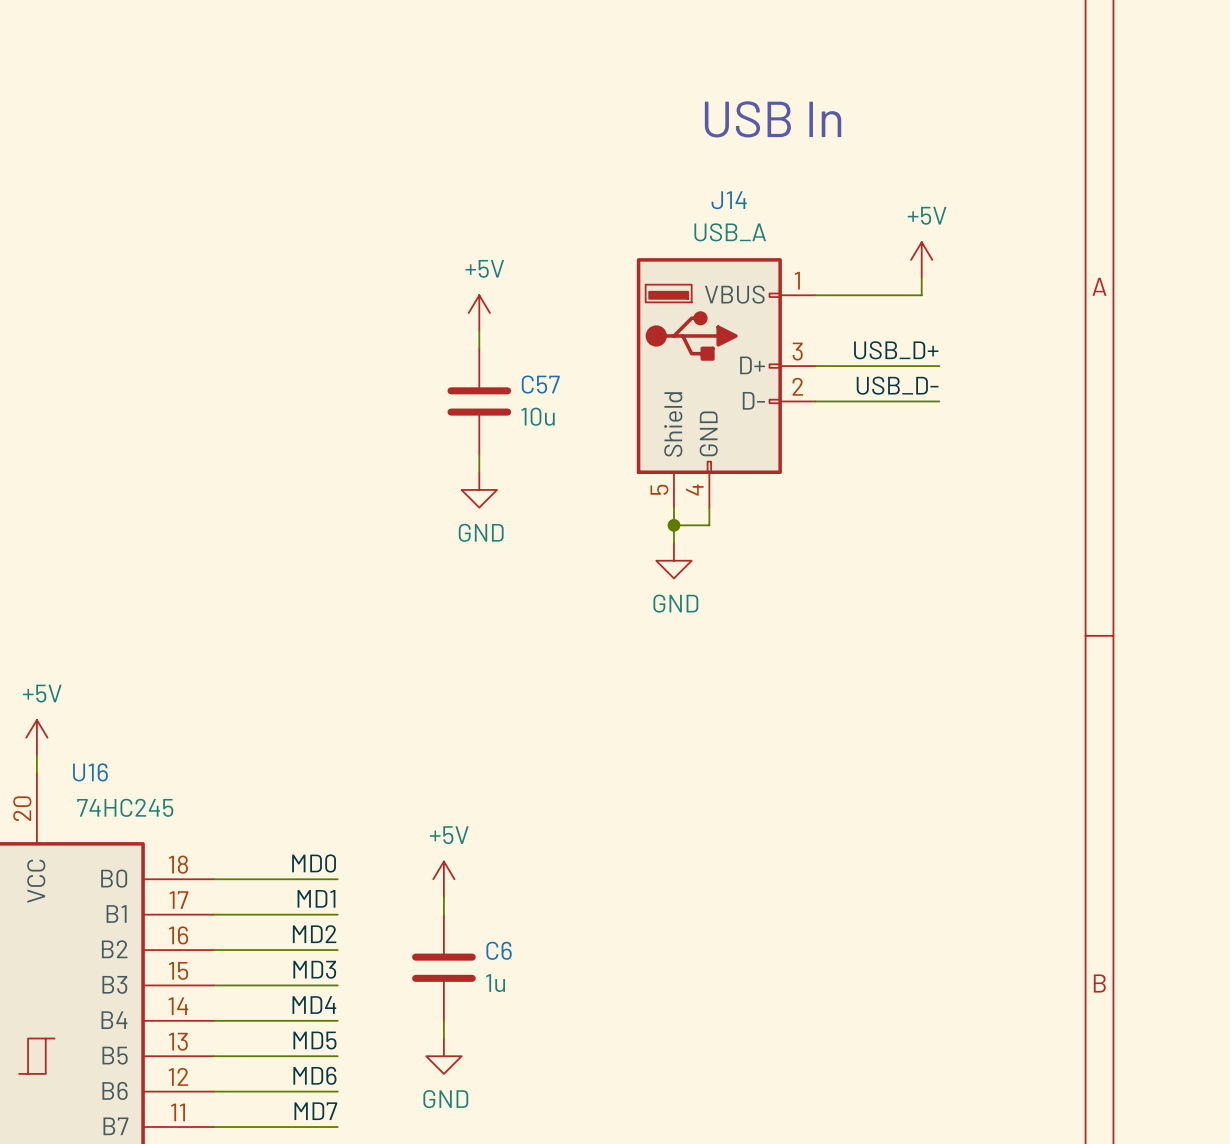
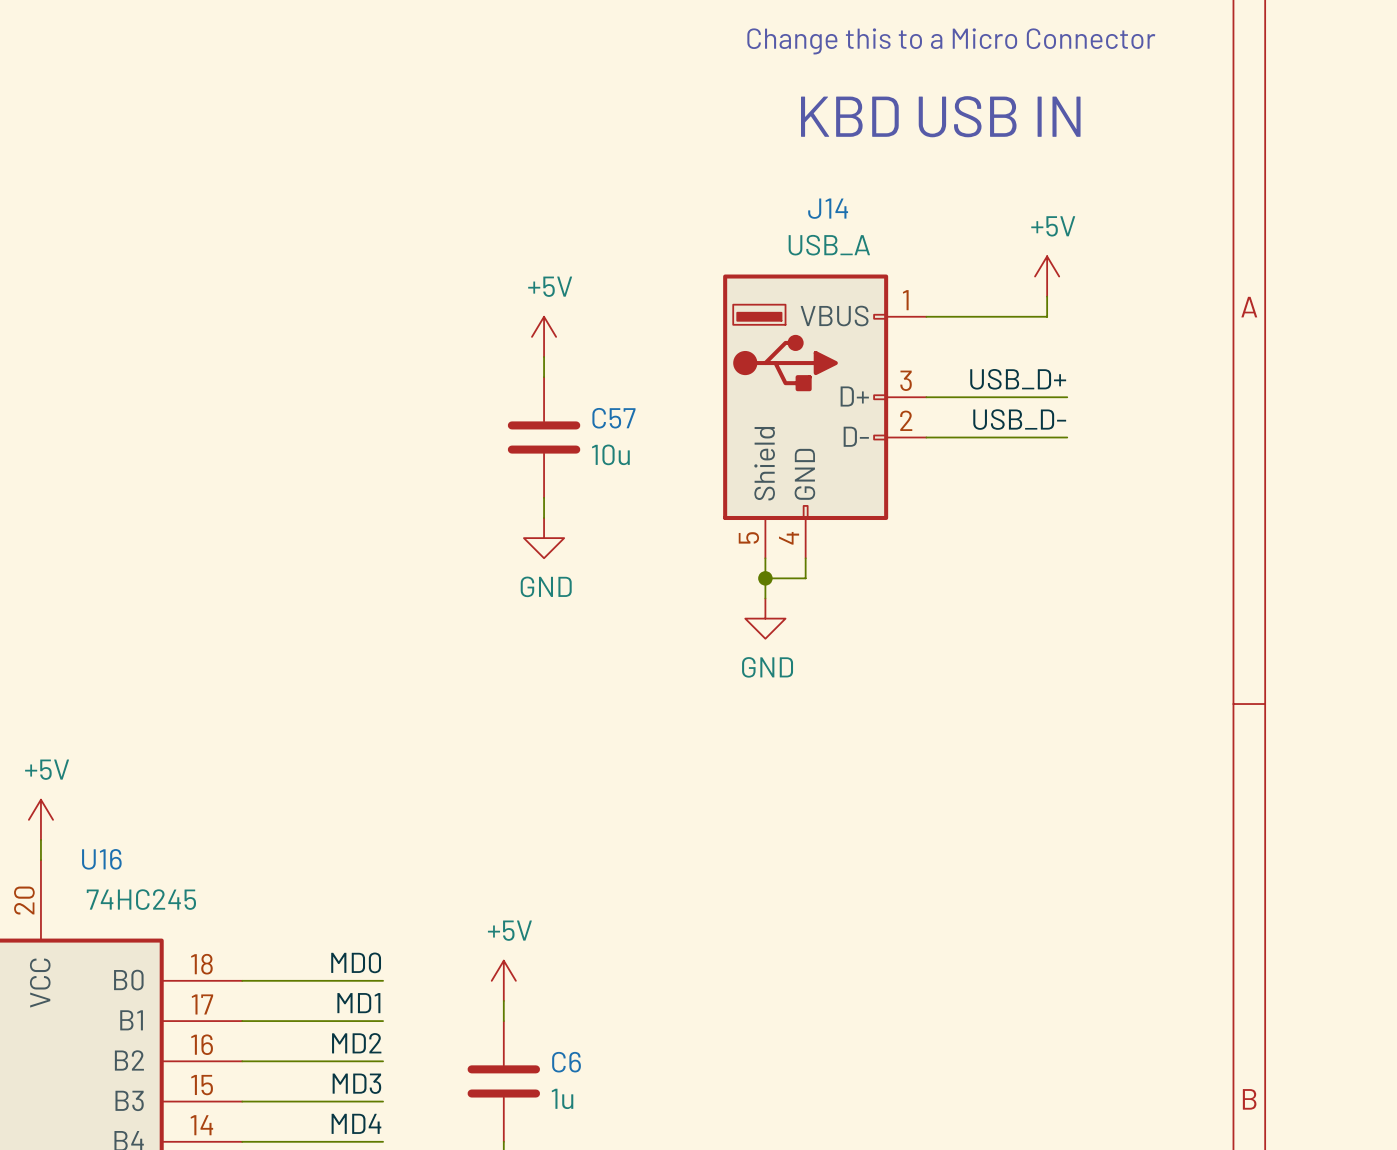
text: none -> Change this to a Micro Connector (951, 41)
text: USB In (773, 119) -> KBD USB IN (940, 116)

